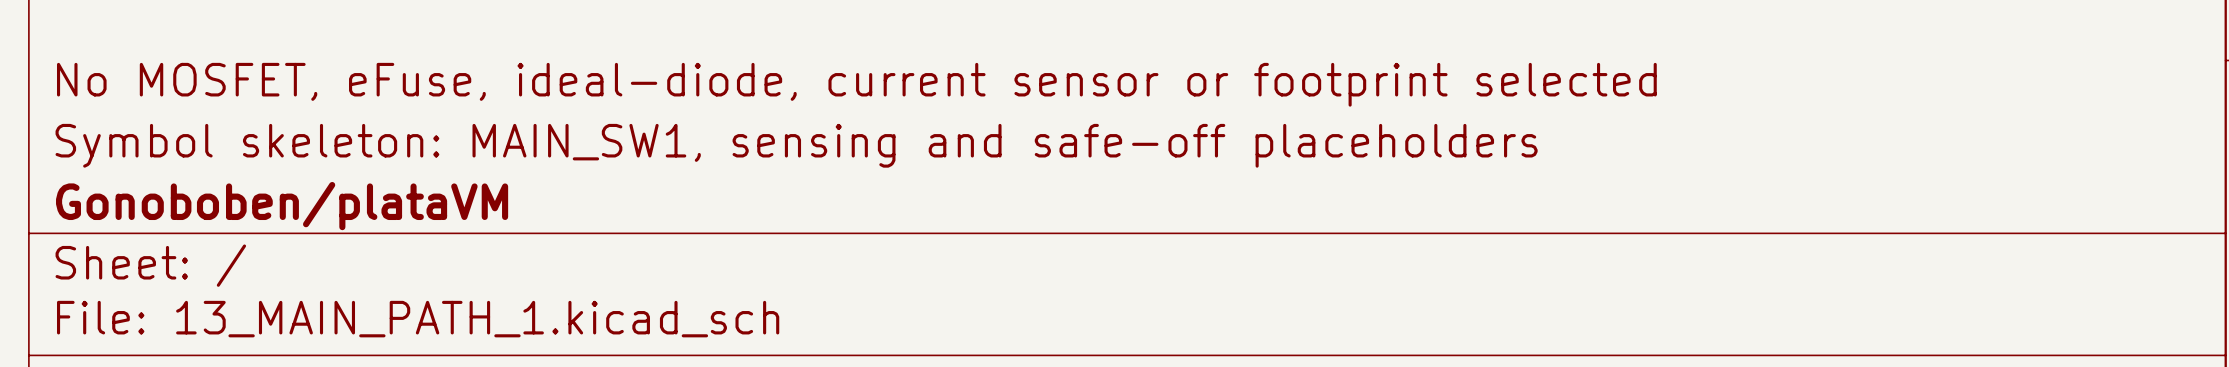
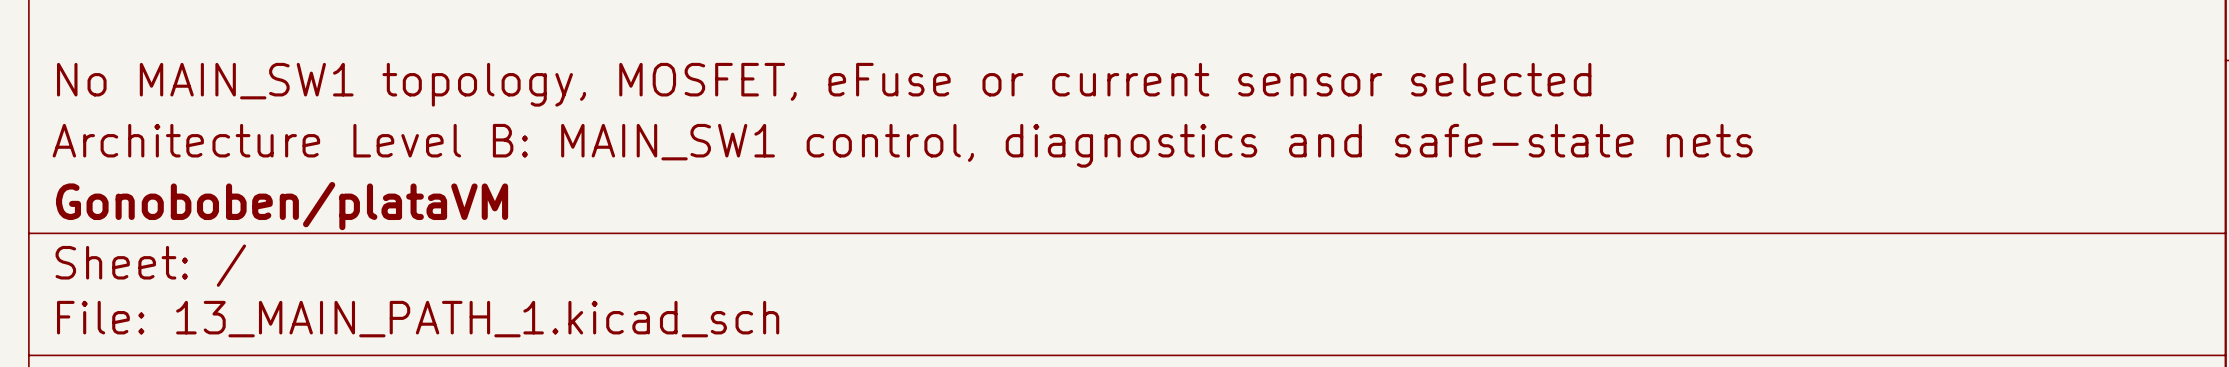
title block: No MOSFET, eFuse, ideal-diode, current sensor or footprint selected (856, 84) -> No MAIN_SW1 topology, MOSFET, eFuse or current sensor selected (824, 84)
title block: Symbol skeleton: MAIN_SW1, sensing and safe-off placeholders (796, 145) -> Architecture Level B: MAIN_SW1 control, diagnostics and safe-state nets (902, 145)

